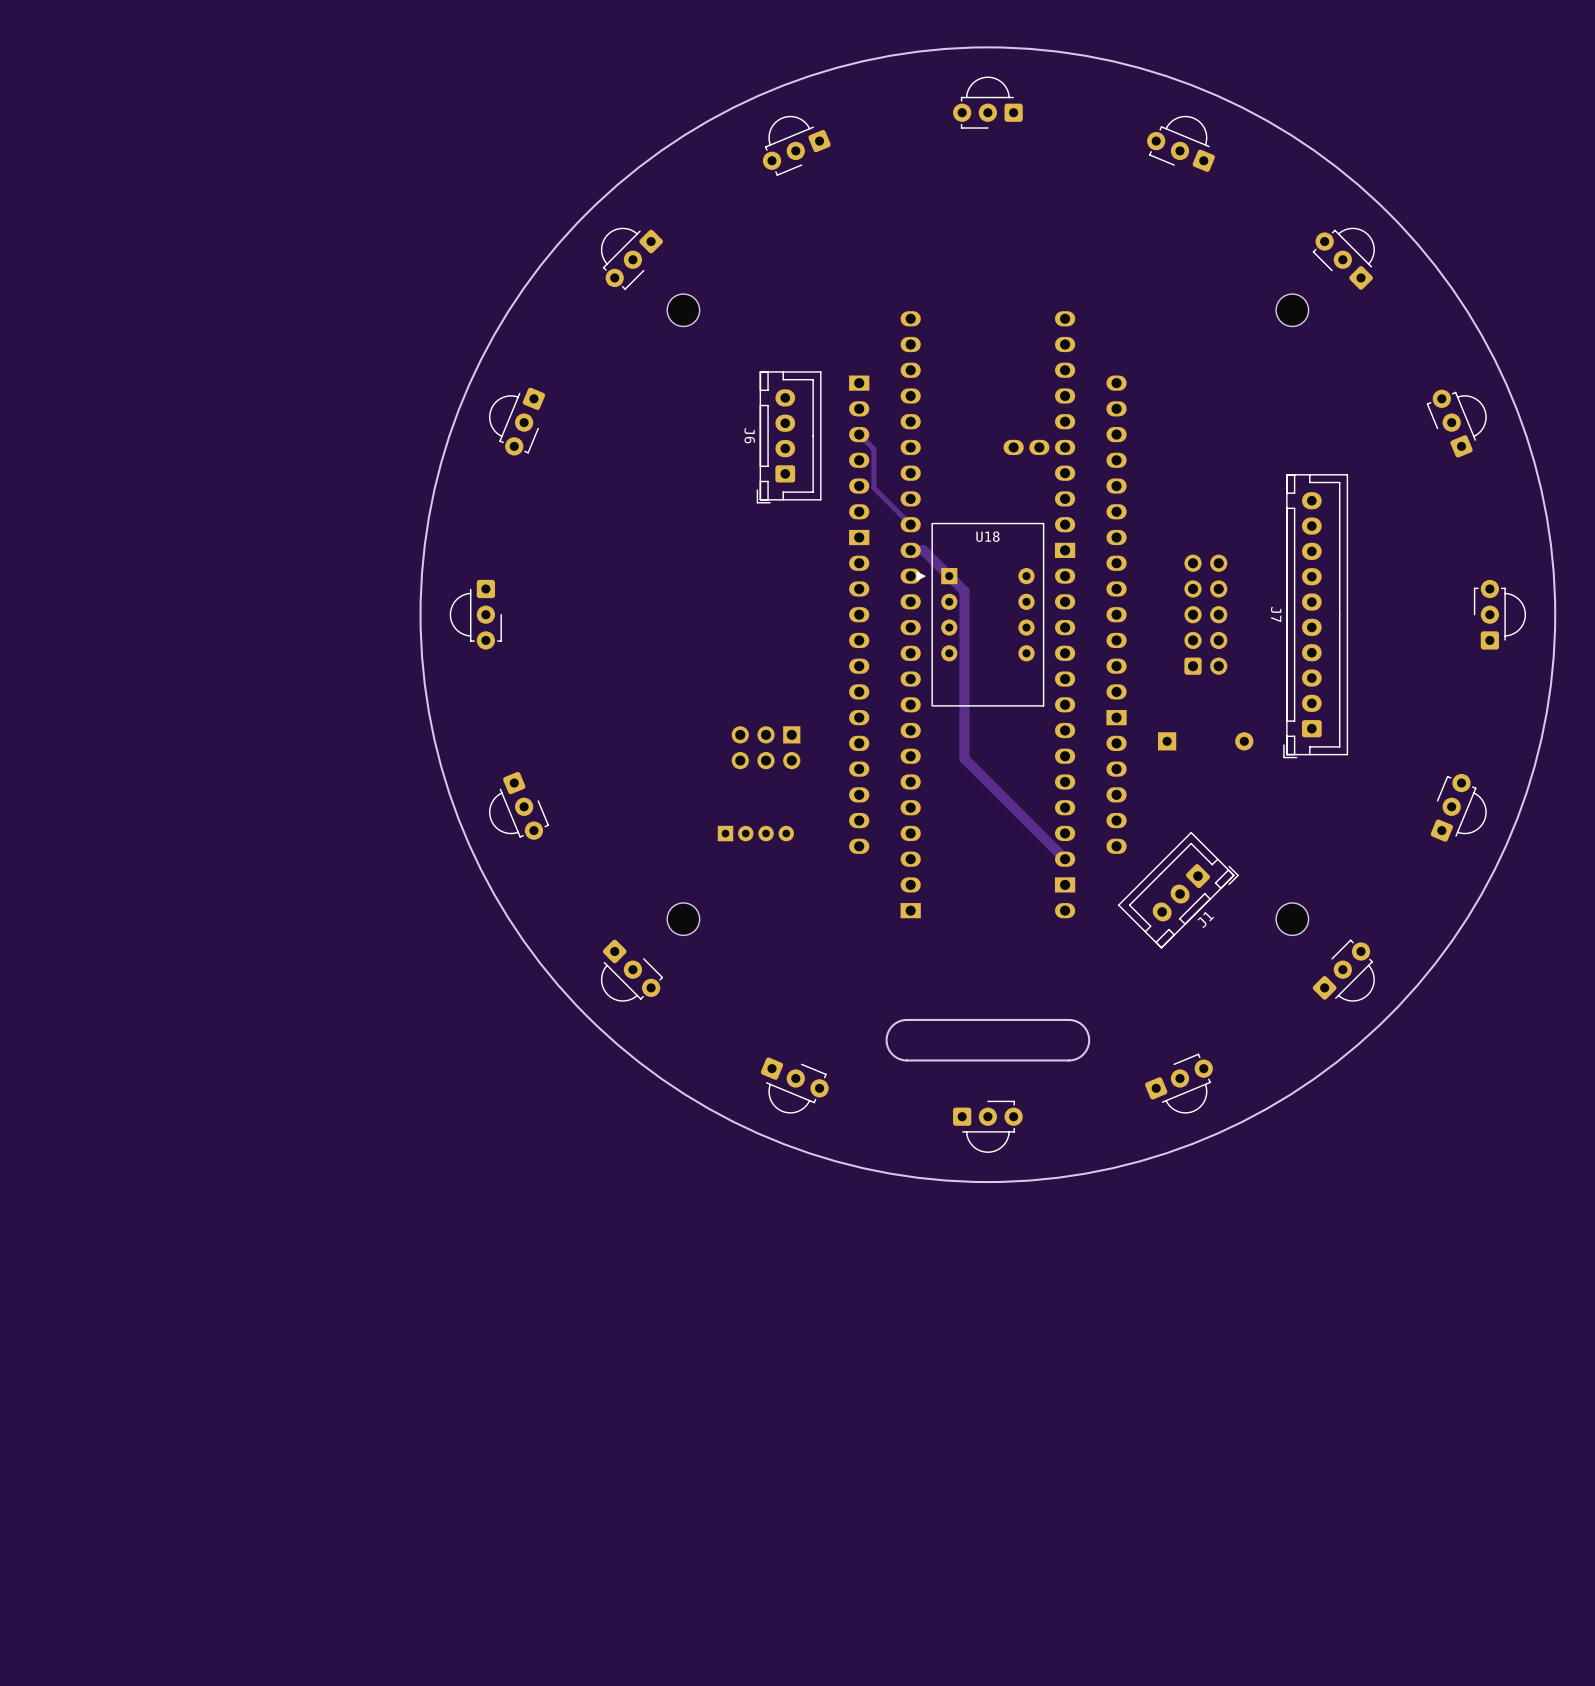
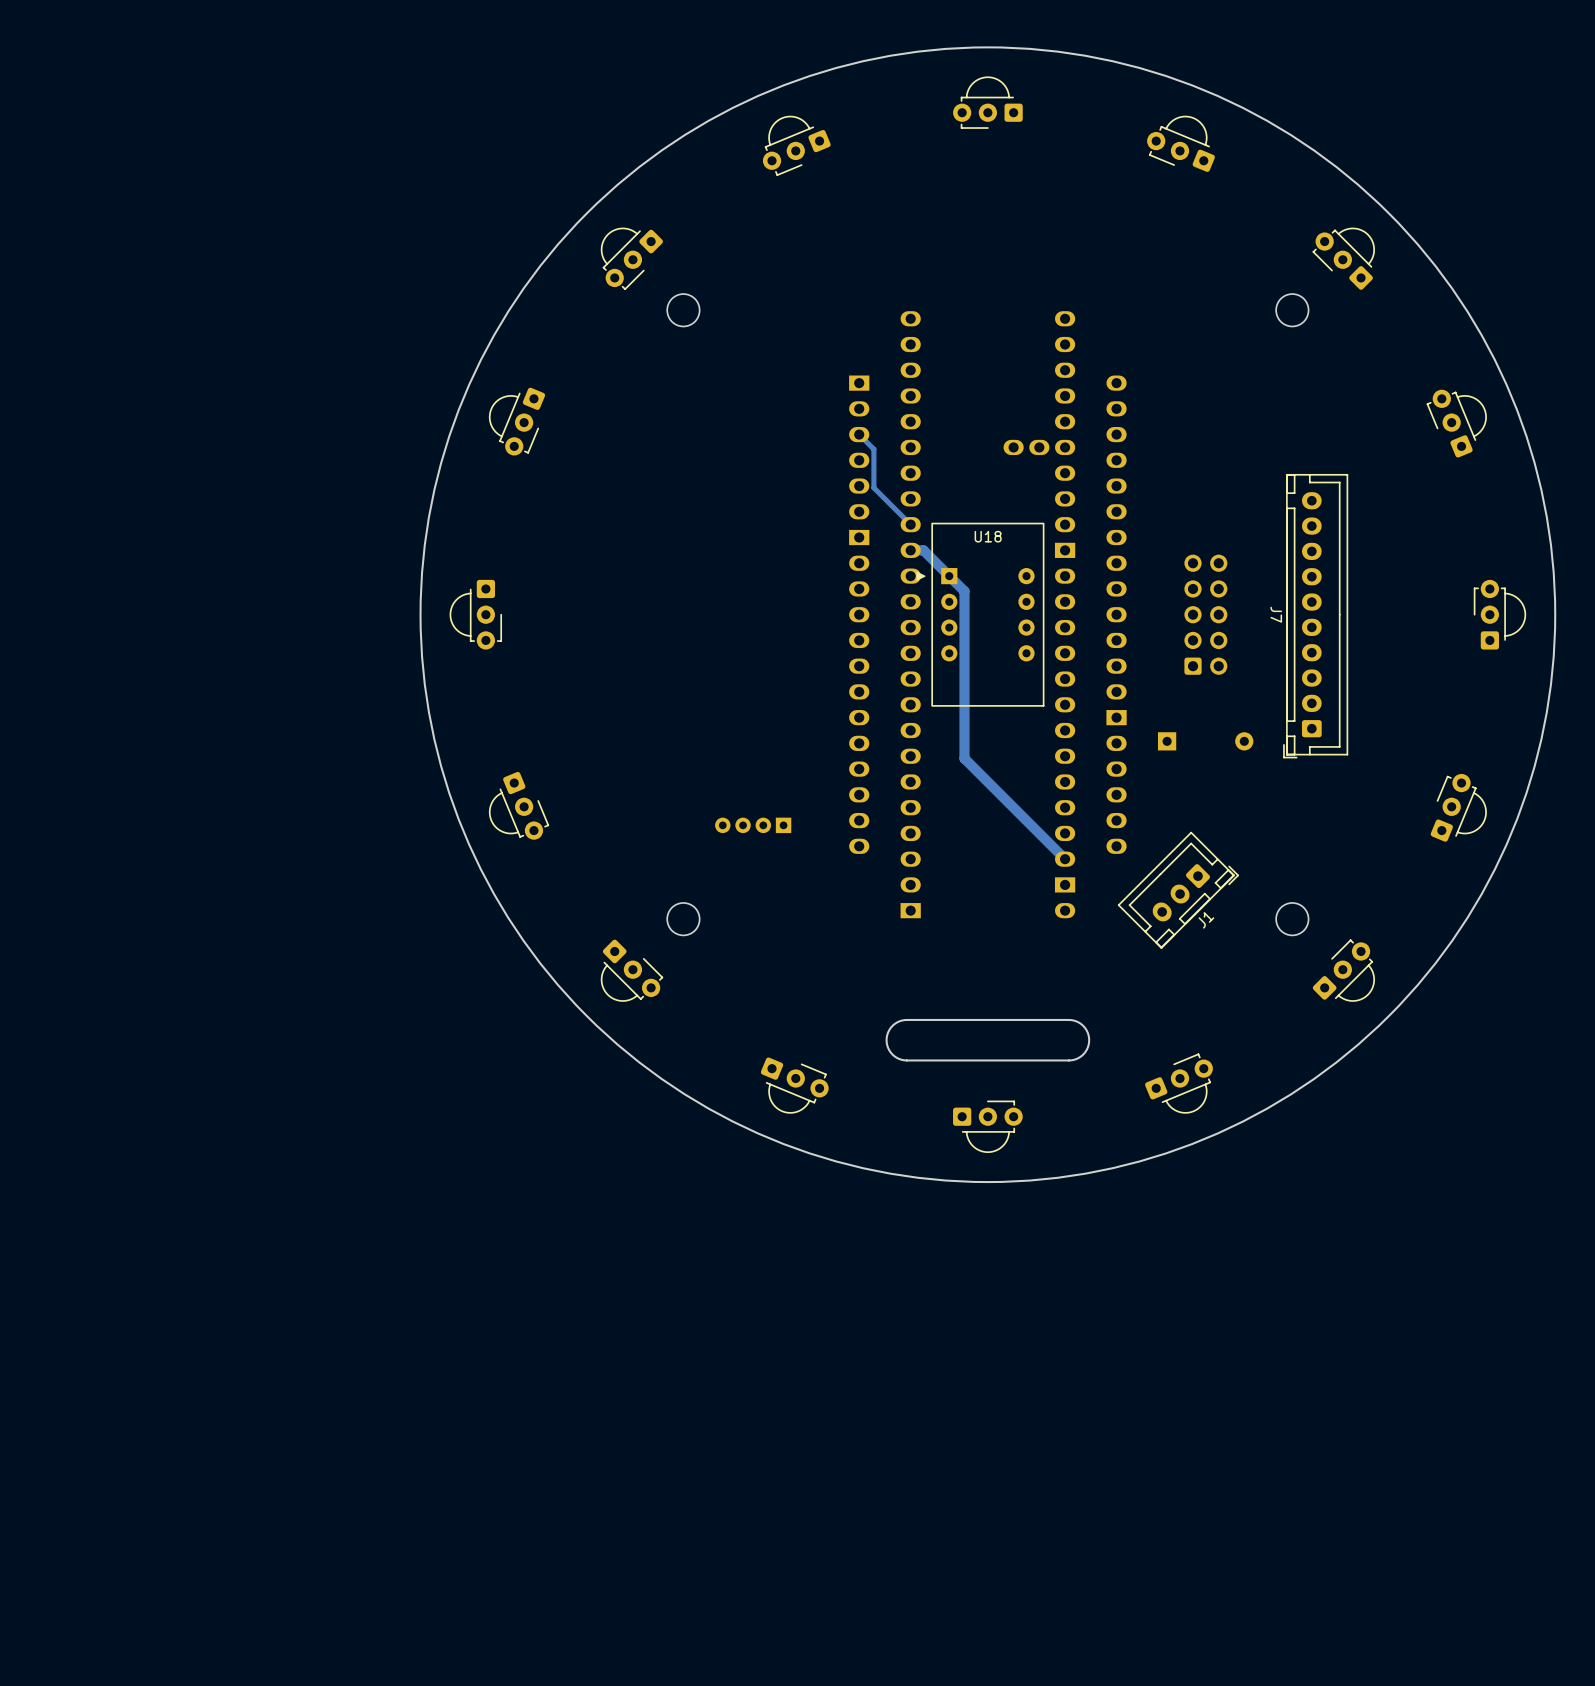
J6: (789, 437) -> none
part: (766, 747) -> none
part rotation: 0° (755, 833) -> 180° (753, 825)

